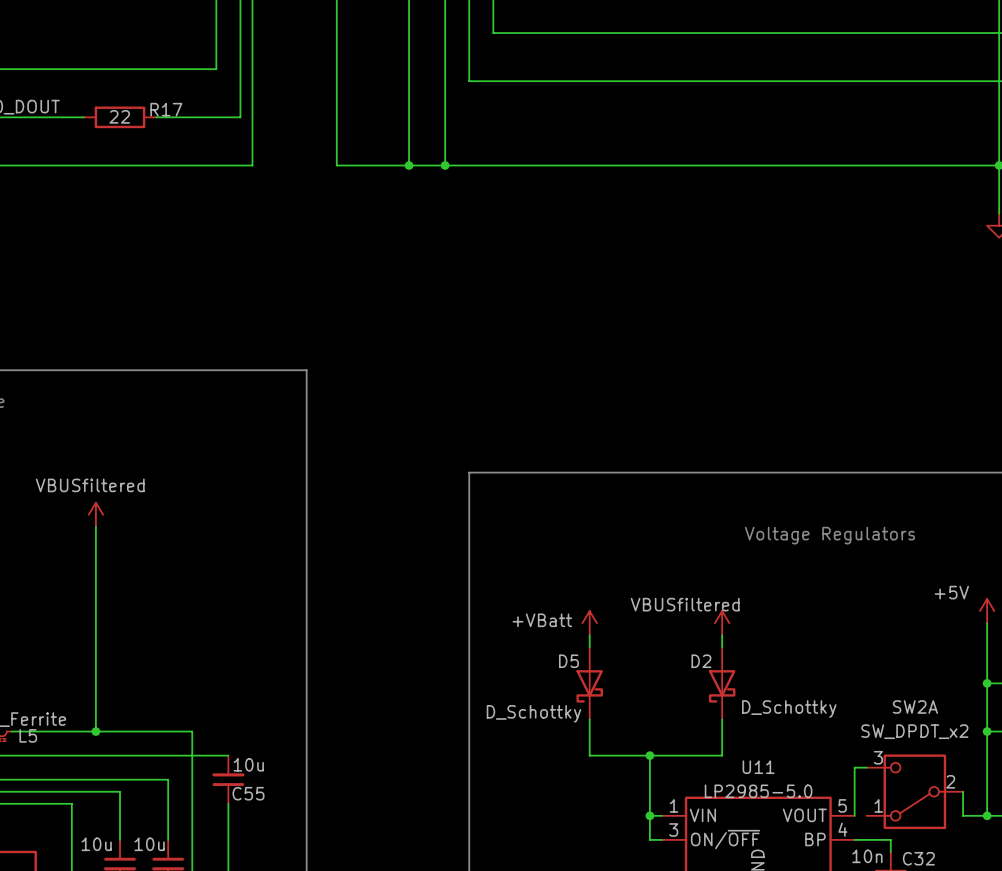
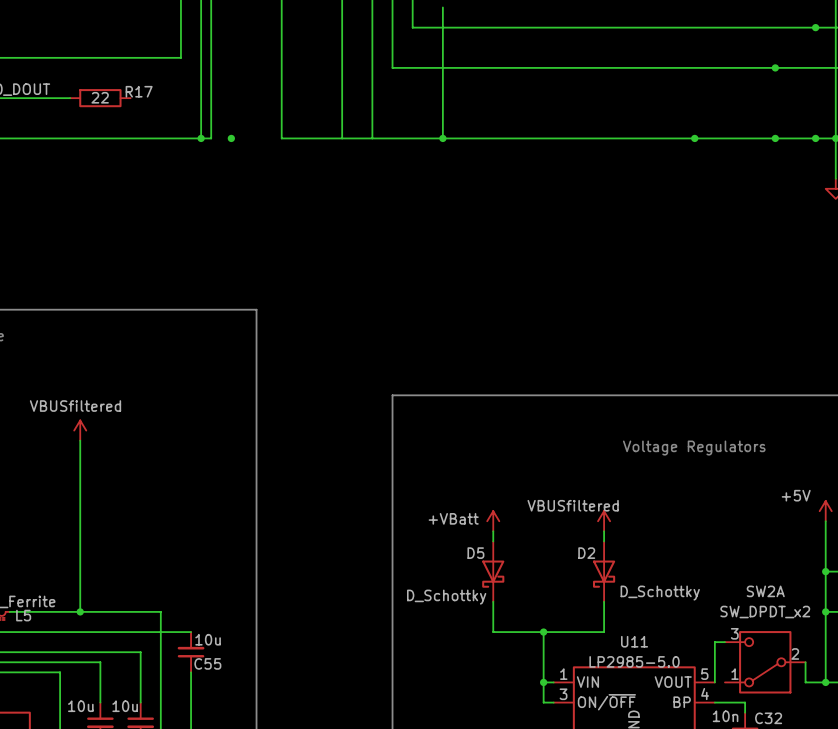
wire: none -> (442, 7) (442, 138)
junction: none -> (815, 27)
junction: none -> (775, 67)
wire: (156, 117) (240, 117) -> (201, 138) (201, 98)
junction: none -> (201, 138)
junction: none -> (231, 138)
junction: (409, 165) -> none
junction: (445, 165) -> none
junction: none -> (442, 138)
junction: none -> (694, 138)
junction: none -> (775, 138)
junction: none -> (815, 138)

